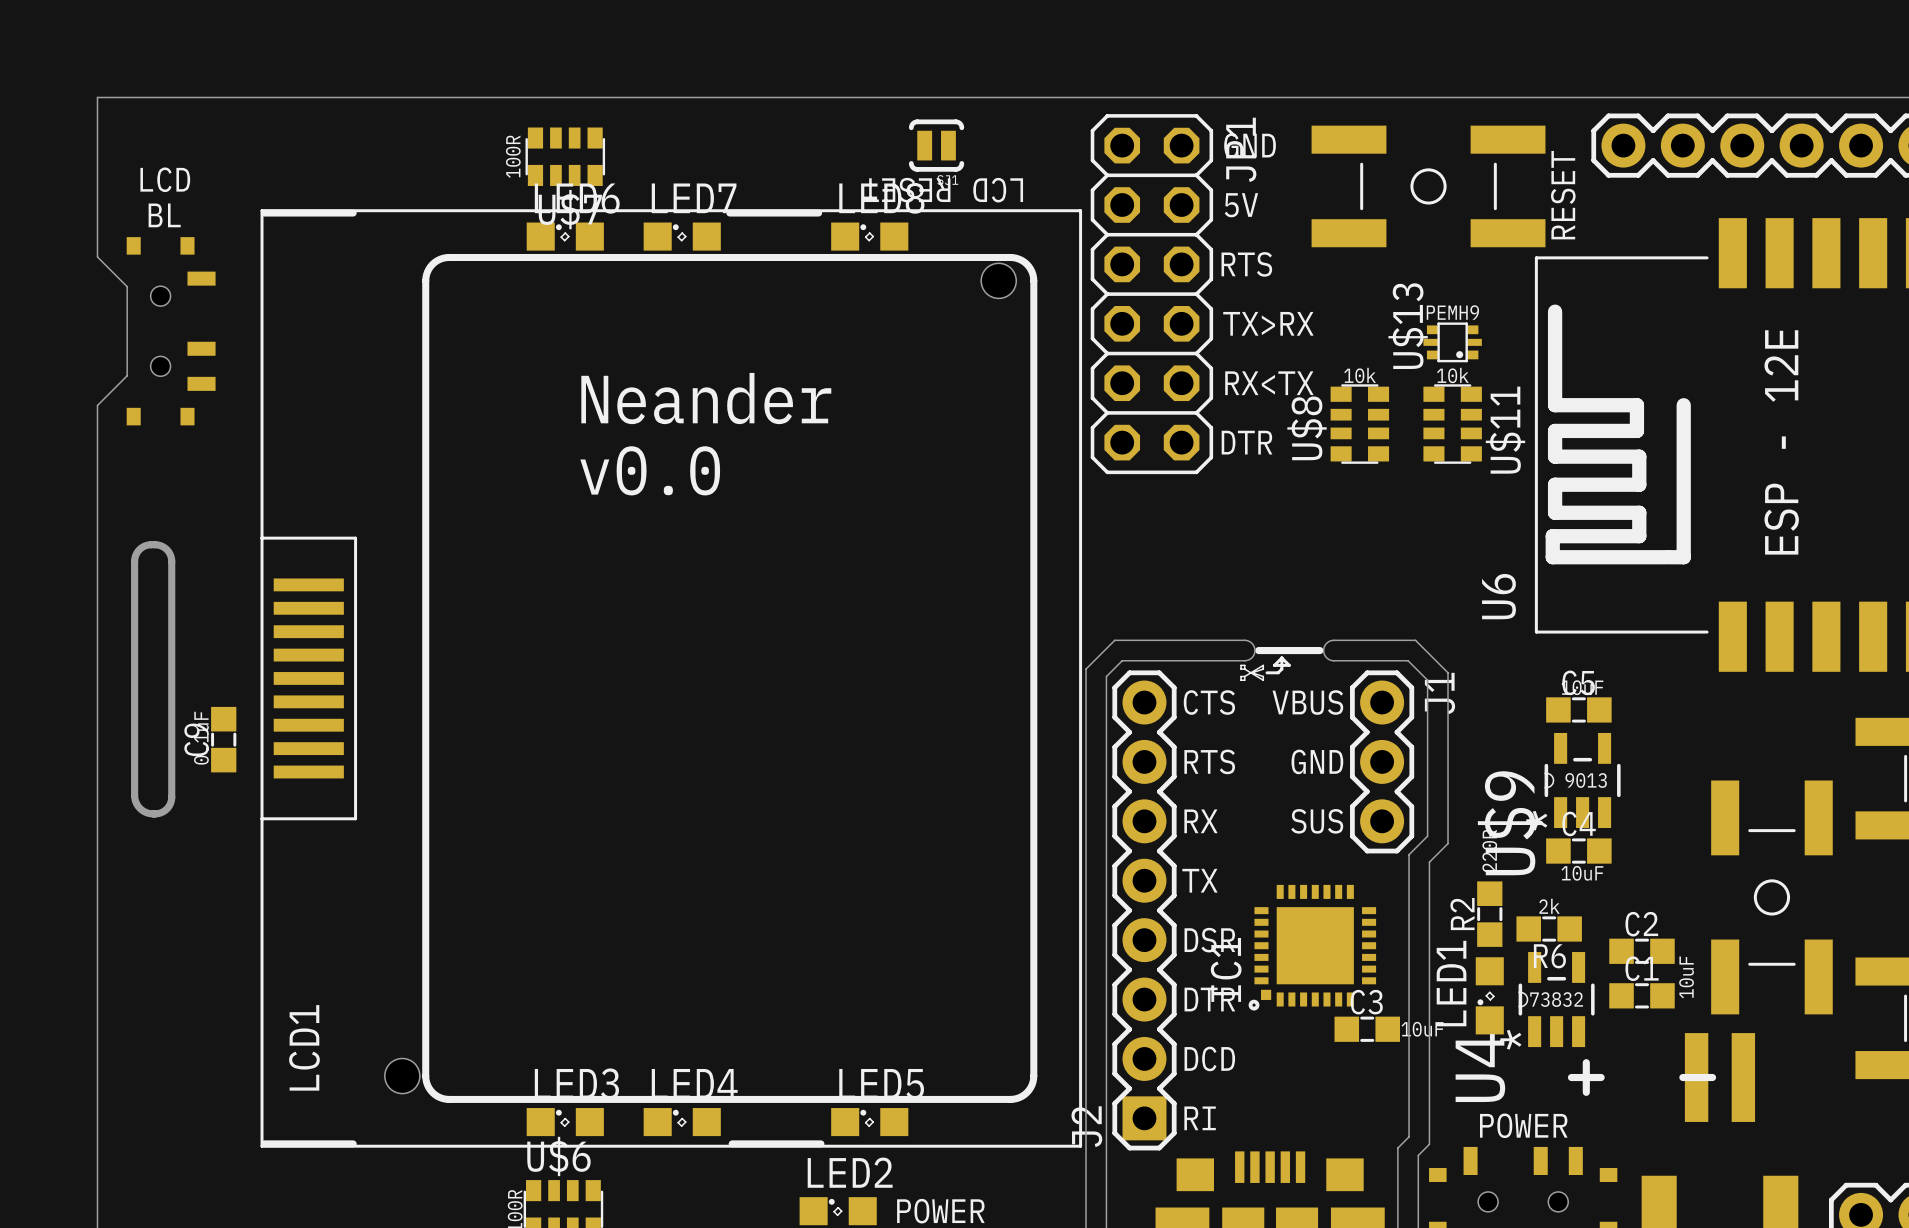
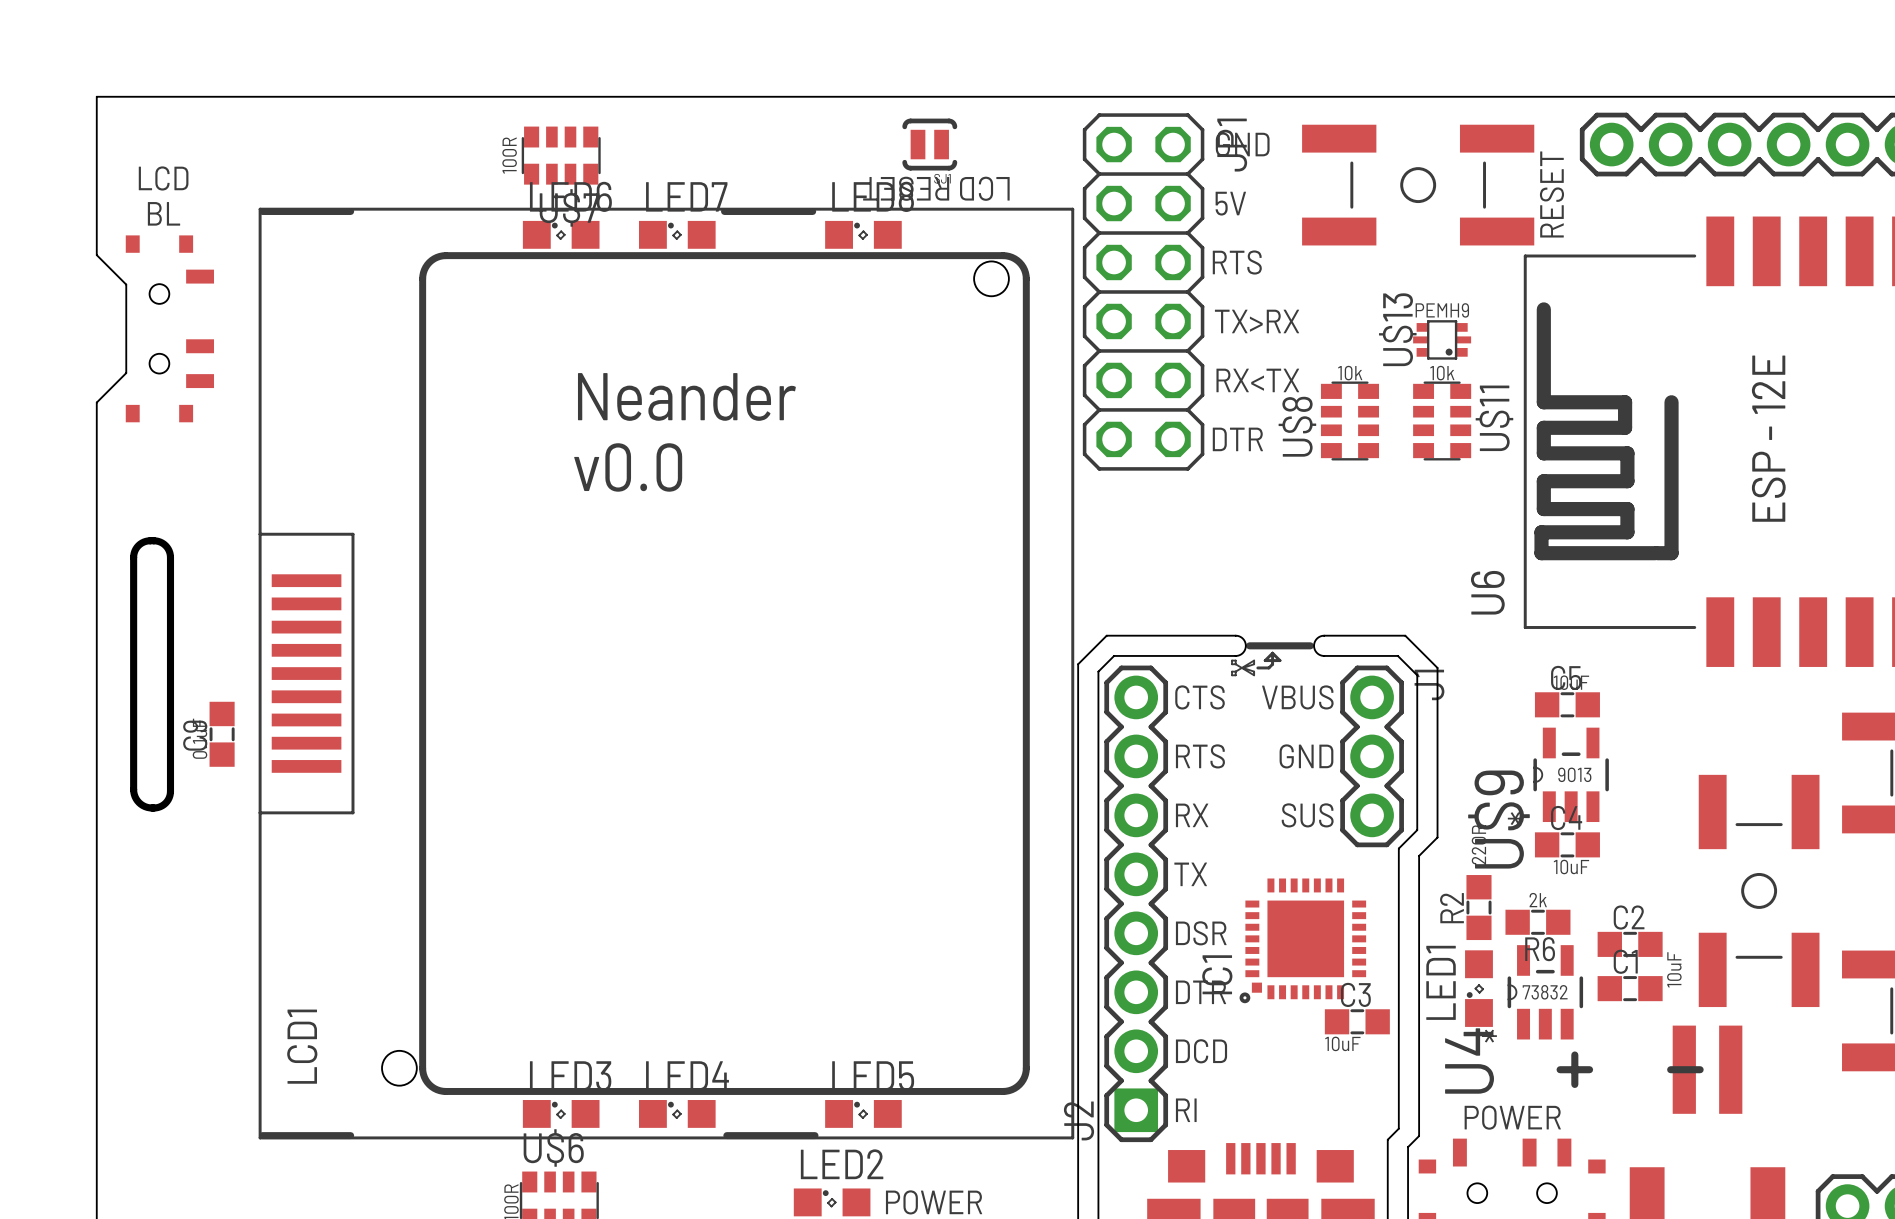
text position: 10uF (1422, 1029) -> 10uF (1342, 1043)

